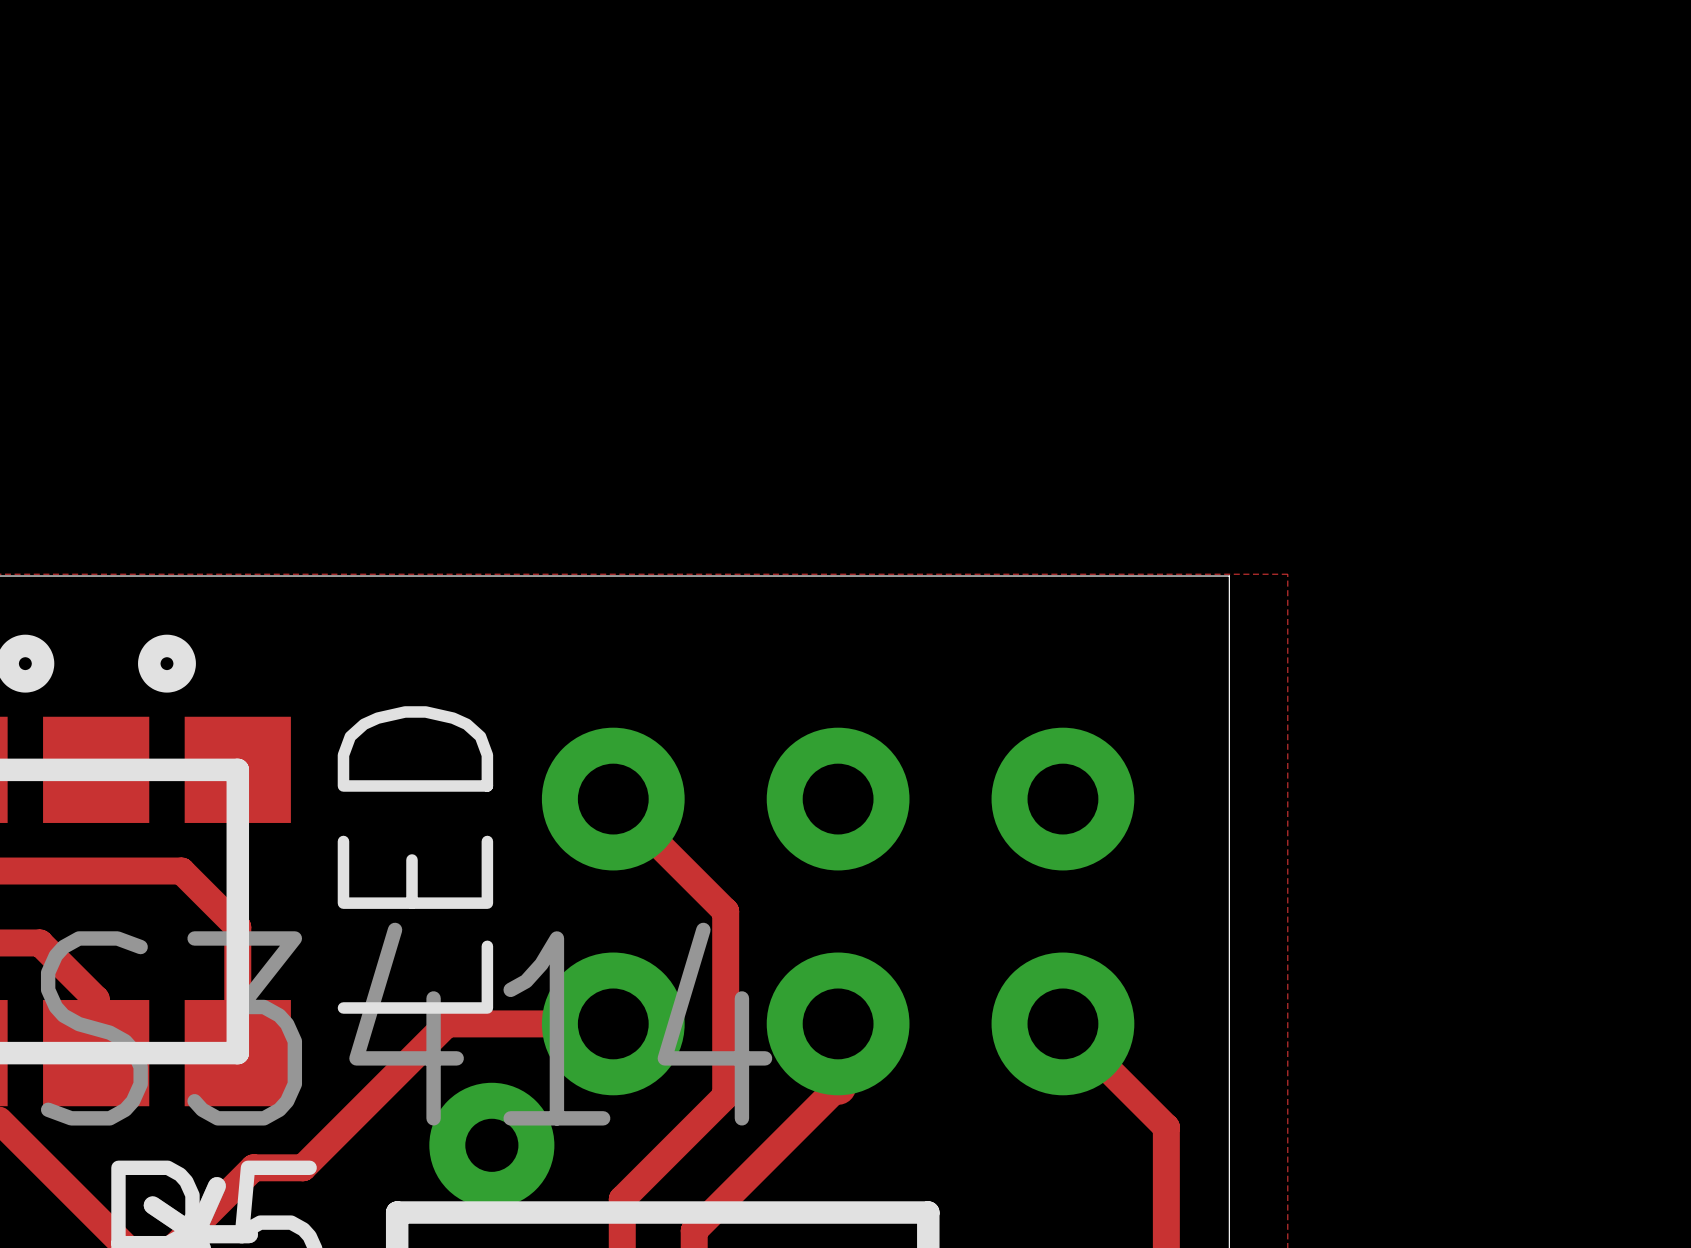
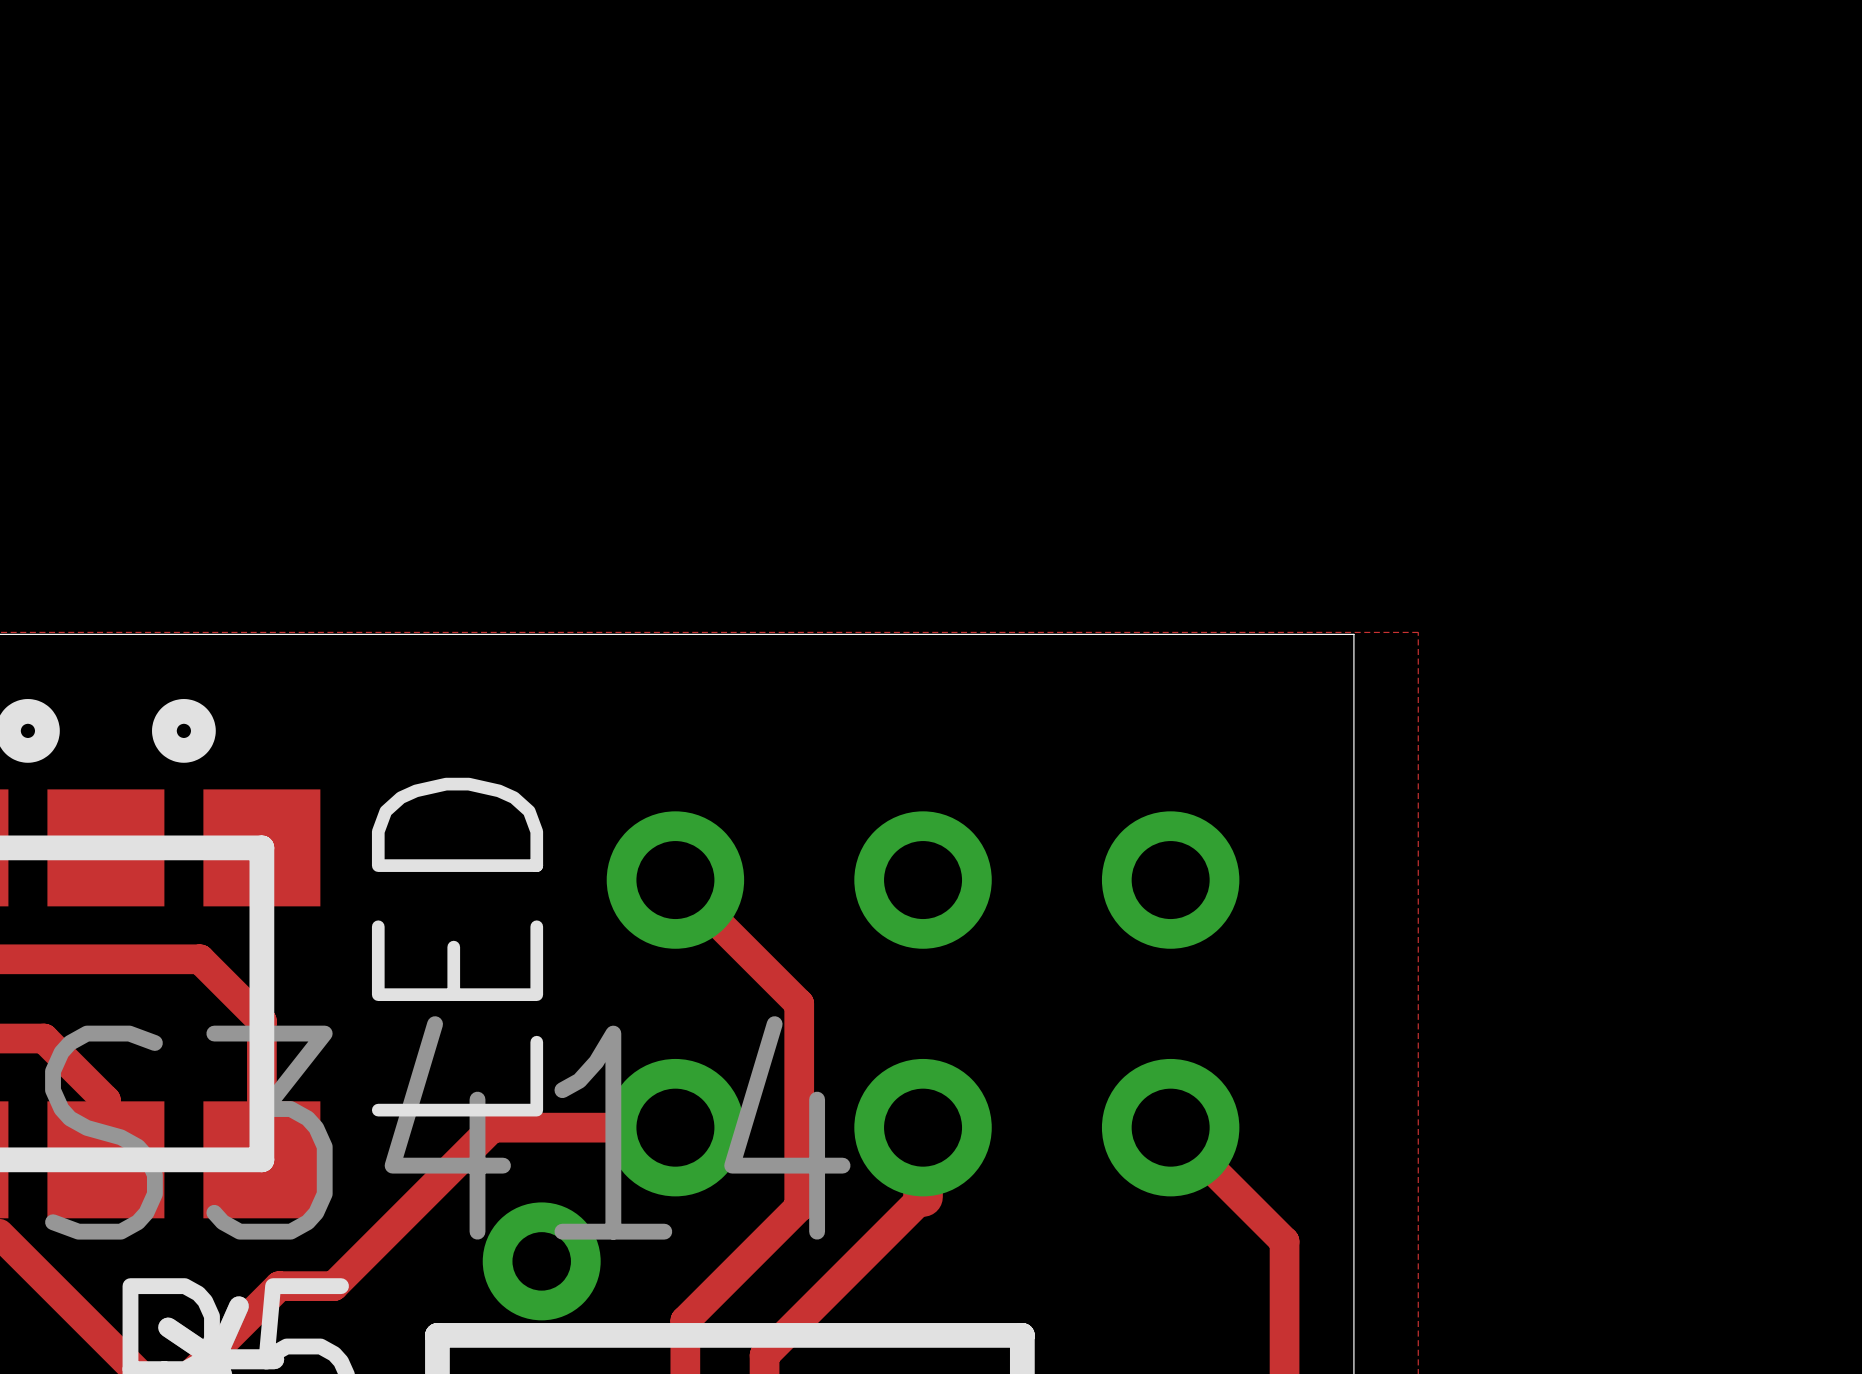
via size: [541, 727, 685, 871] -> [606, 811, 745, 949]
via size: [766, 727, 910, 871] -> [854, 811, 992, 949]
via size: [991, 727, 1135, 871] -> [1101, 811, 1240, 949]
via size: [541, 952, 685, 1096] -> [606, 1058, 745, 1197]
via size: [766, 952, 910, 1096] -> [854, 1058, 992, 1197]
via size: [991, 952, 1135, 1096] -> [1101, 1058, 1240, 1197]
via size: [429, 1082, 555, 1208] -> [482, 1202, 601, 1321]

